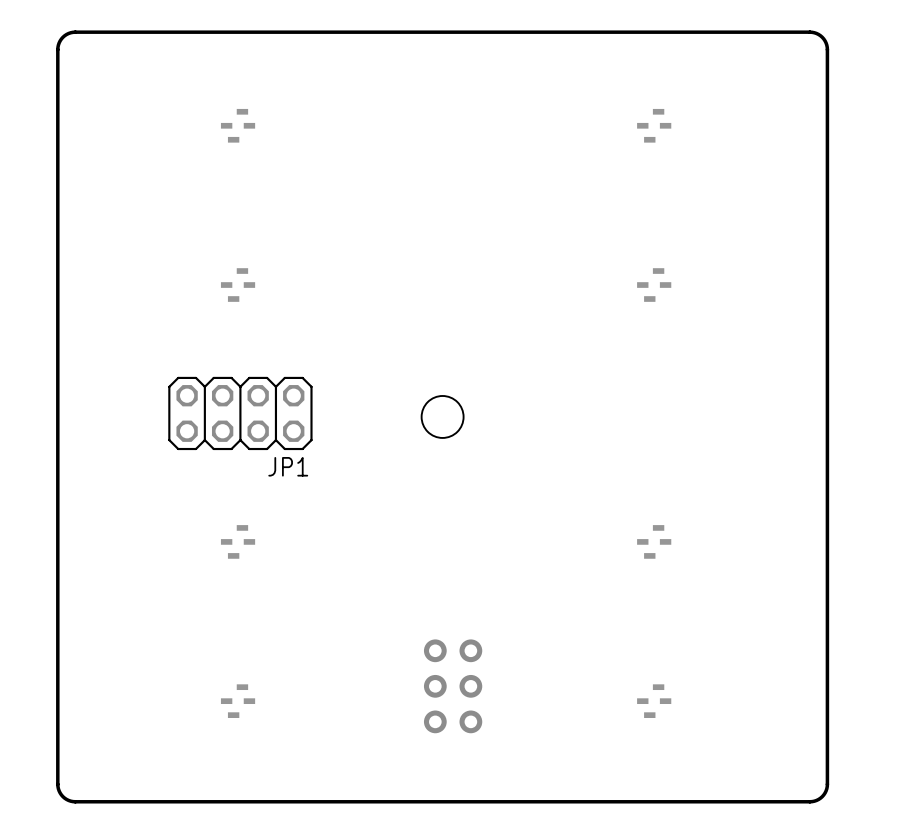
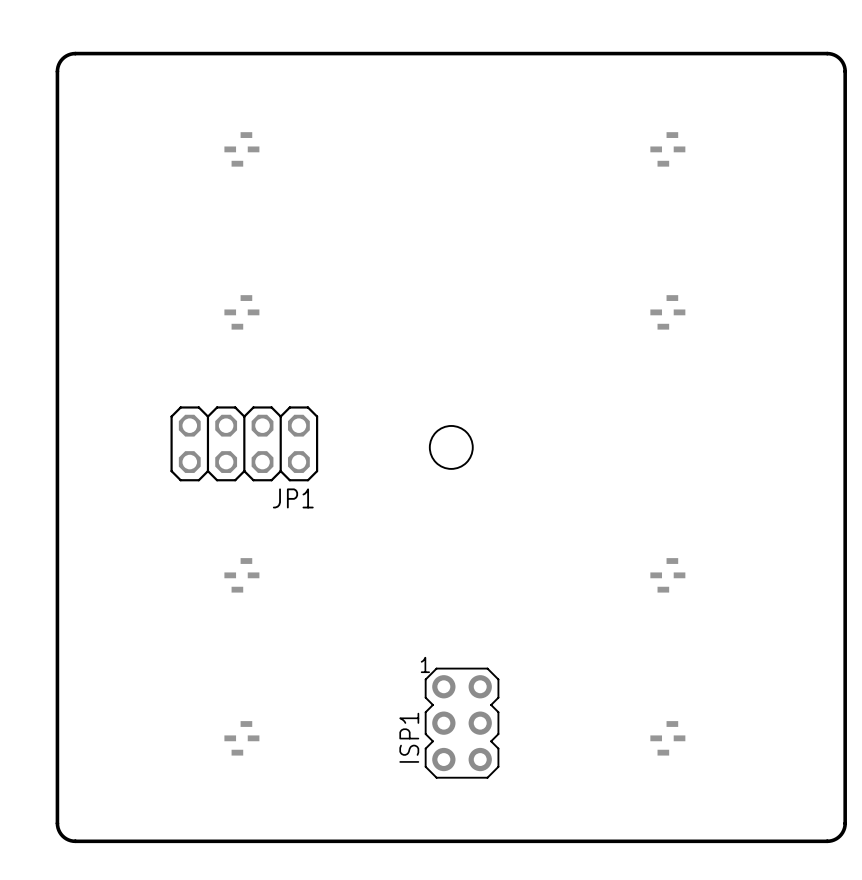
ISP1 side: bottom (453, 686) -> top (462, 723)

